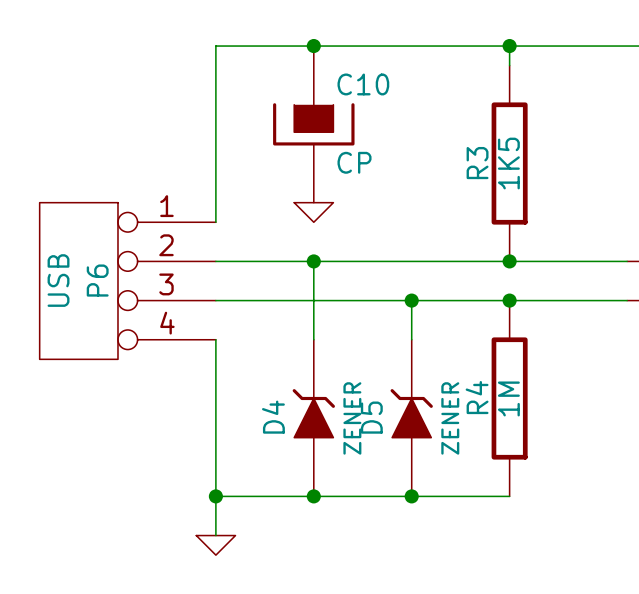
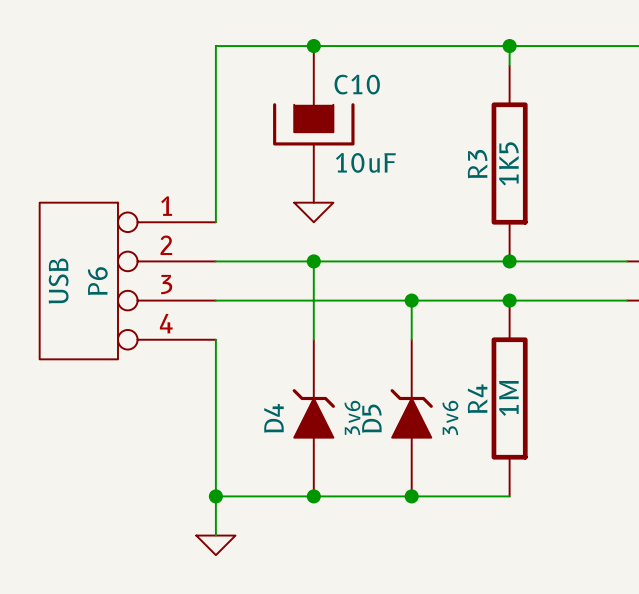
C10 value: CP (354, 162) -> 10uF (365, 162)
D4 value: ZENER (352, 418) -> 3v6 (352, 417)
D5 value: ZENER (450, 418) -> 3v6 (450, 417)

